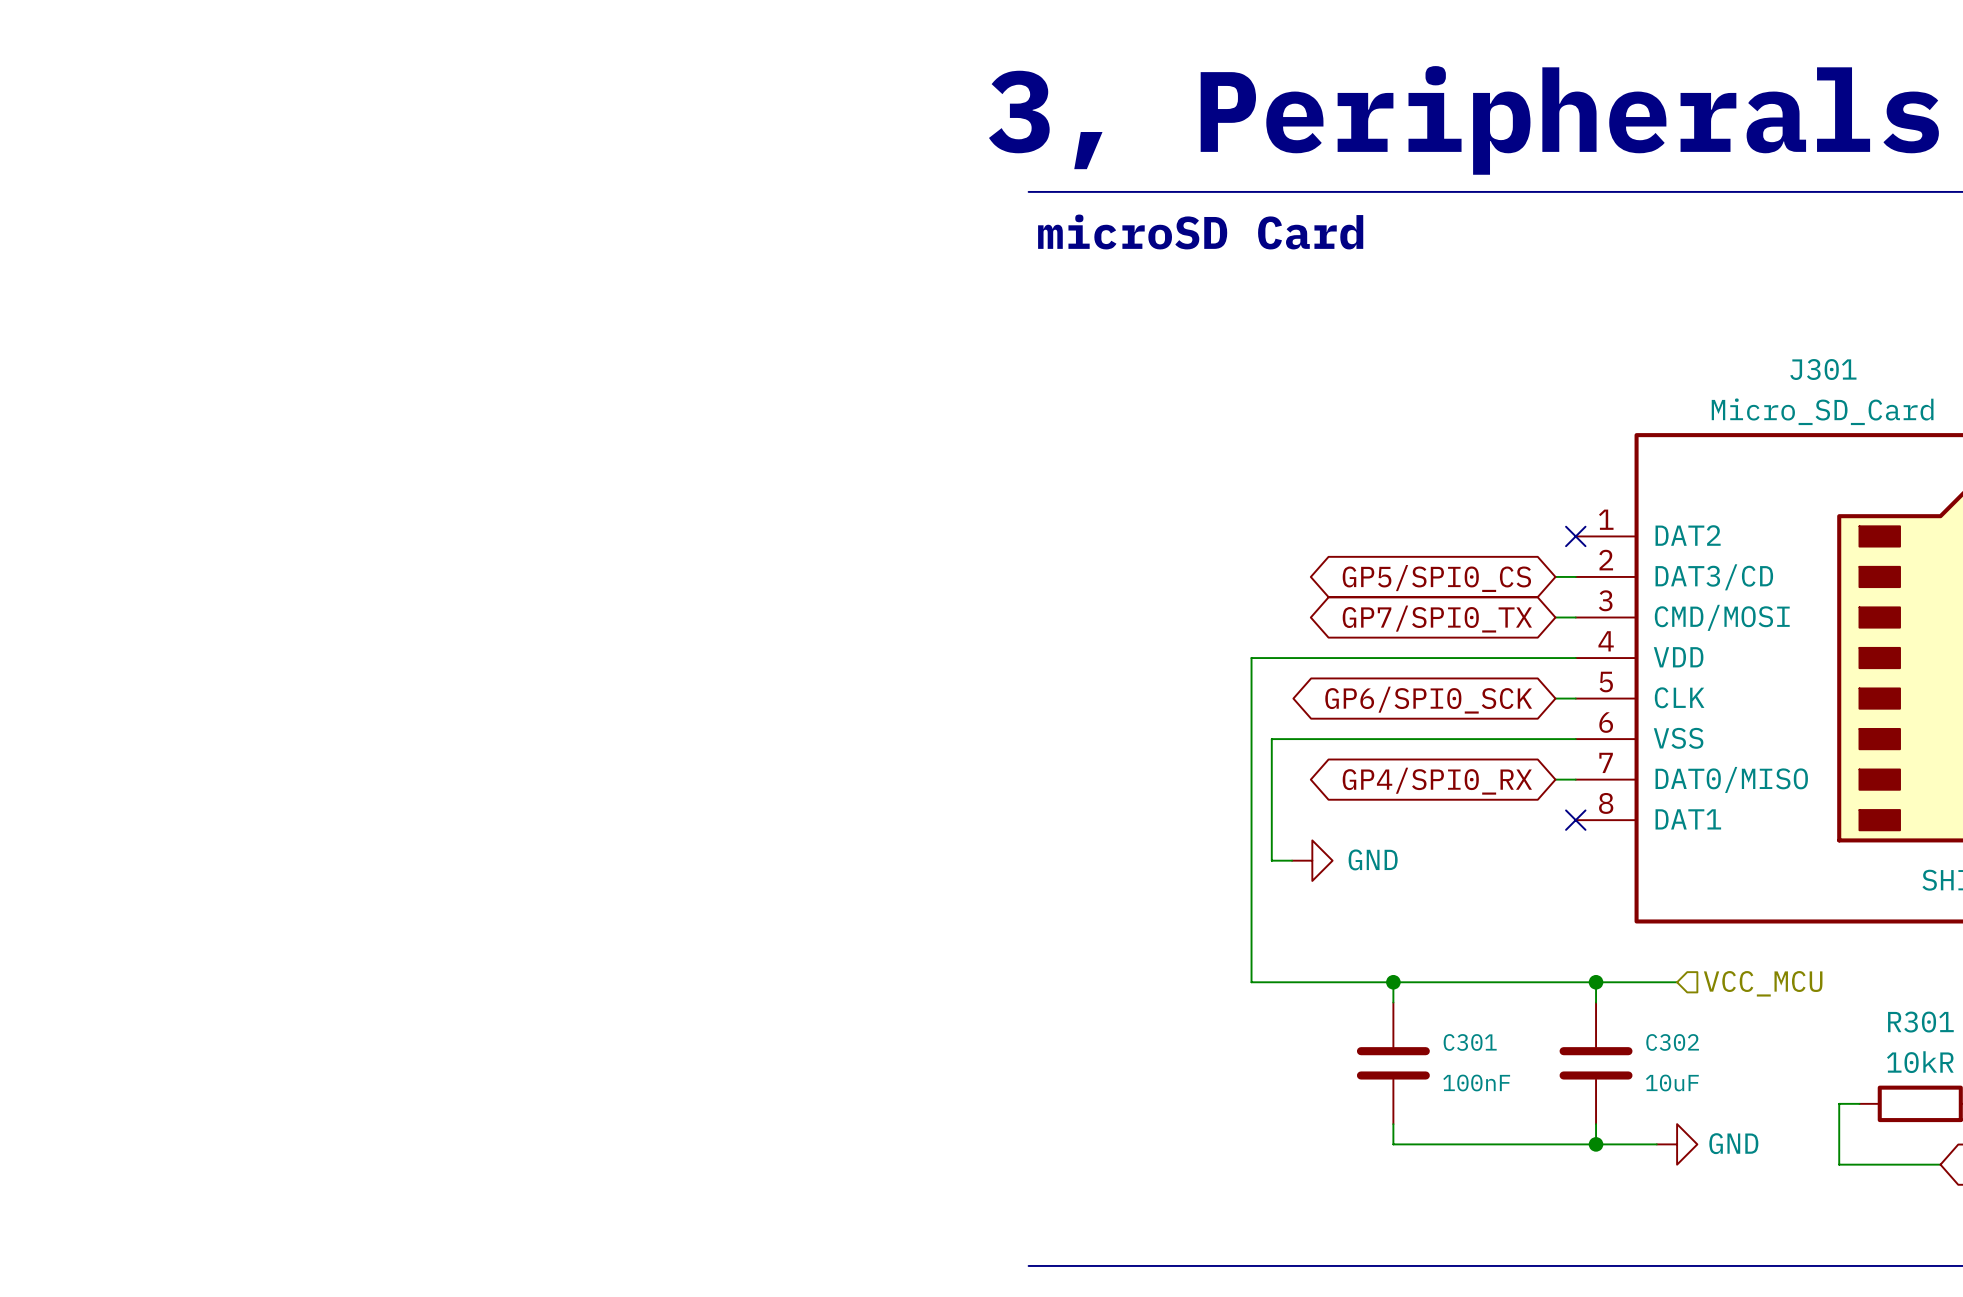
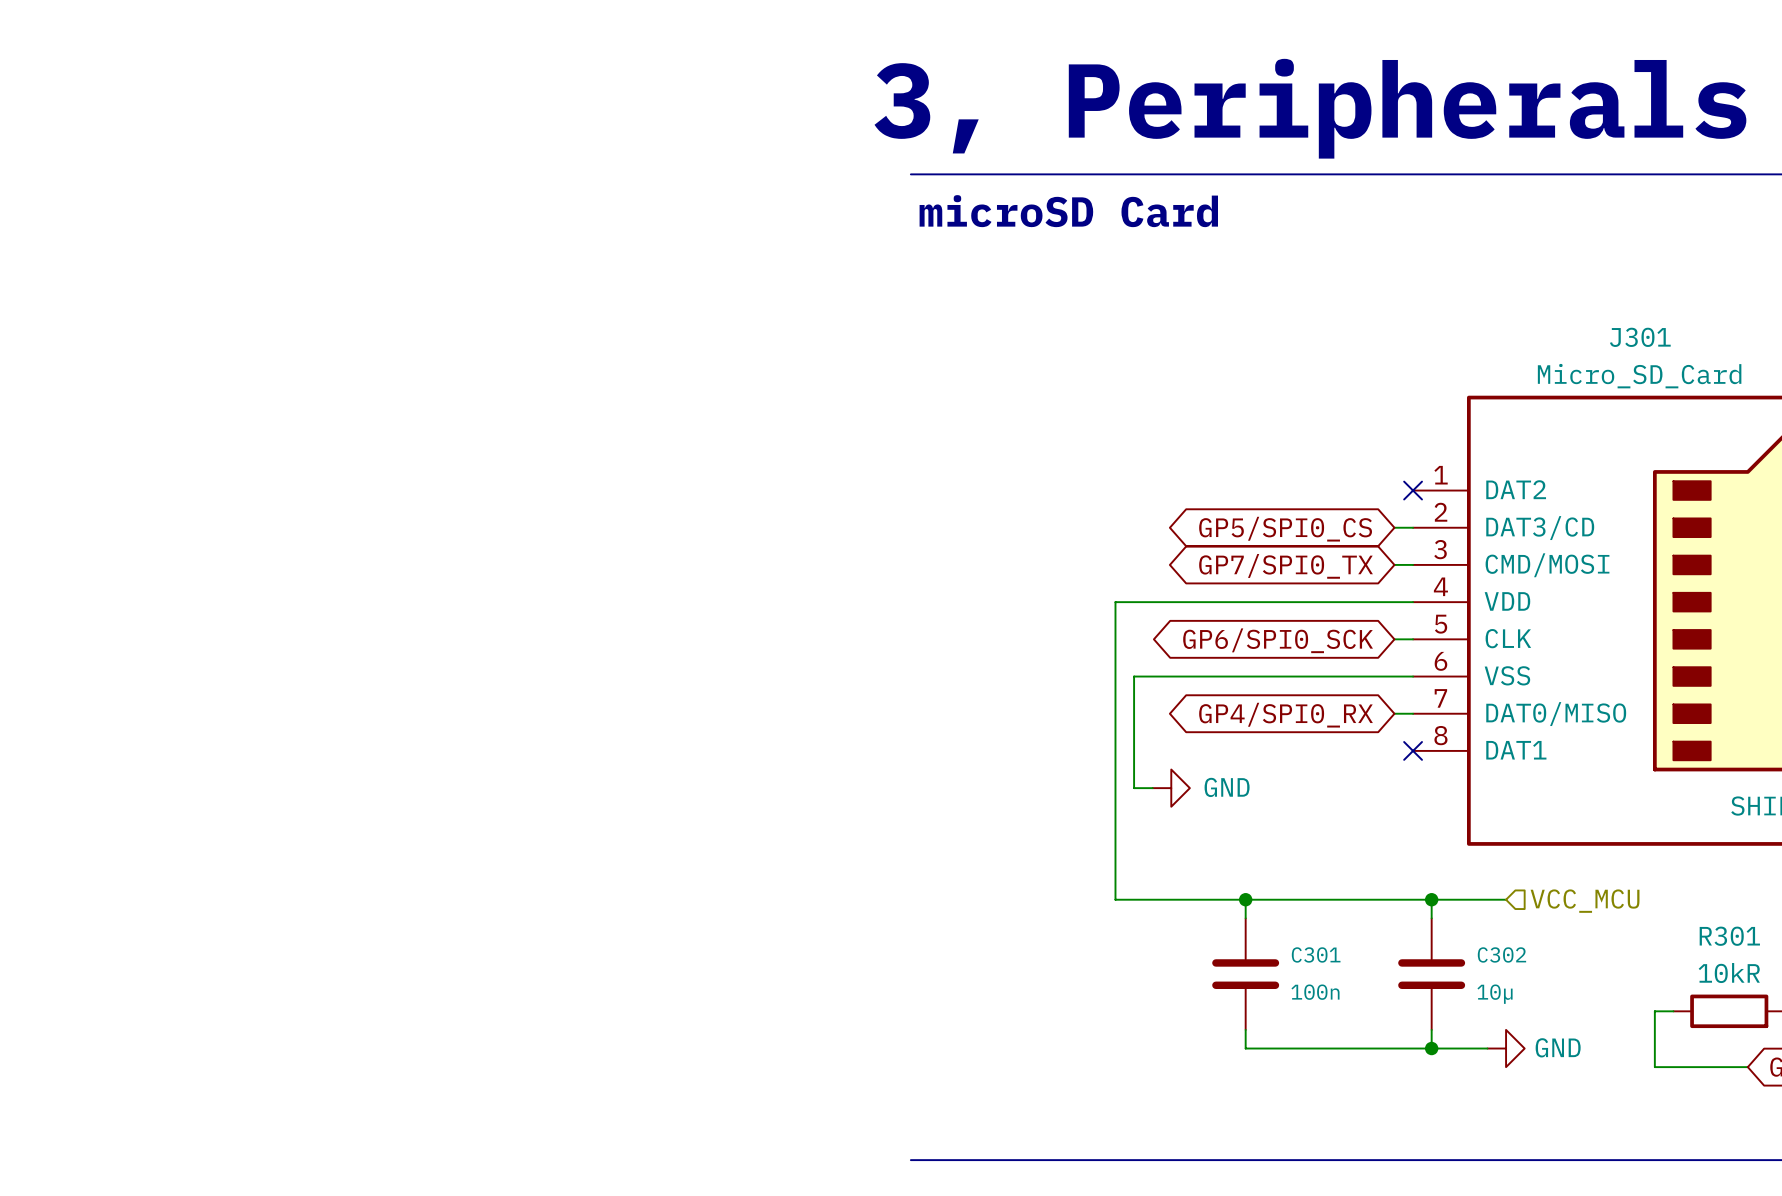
C301 value: 100nF (1476, 1082) -> 100n (1315, 992)
C302 value: 10uF (1672, 1082) -> 10µ (1495, 994)

